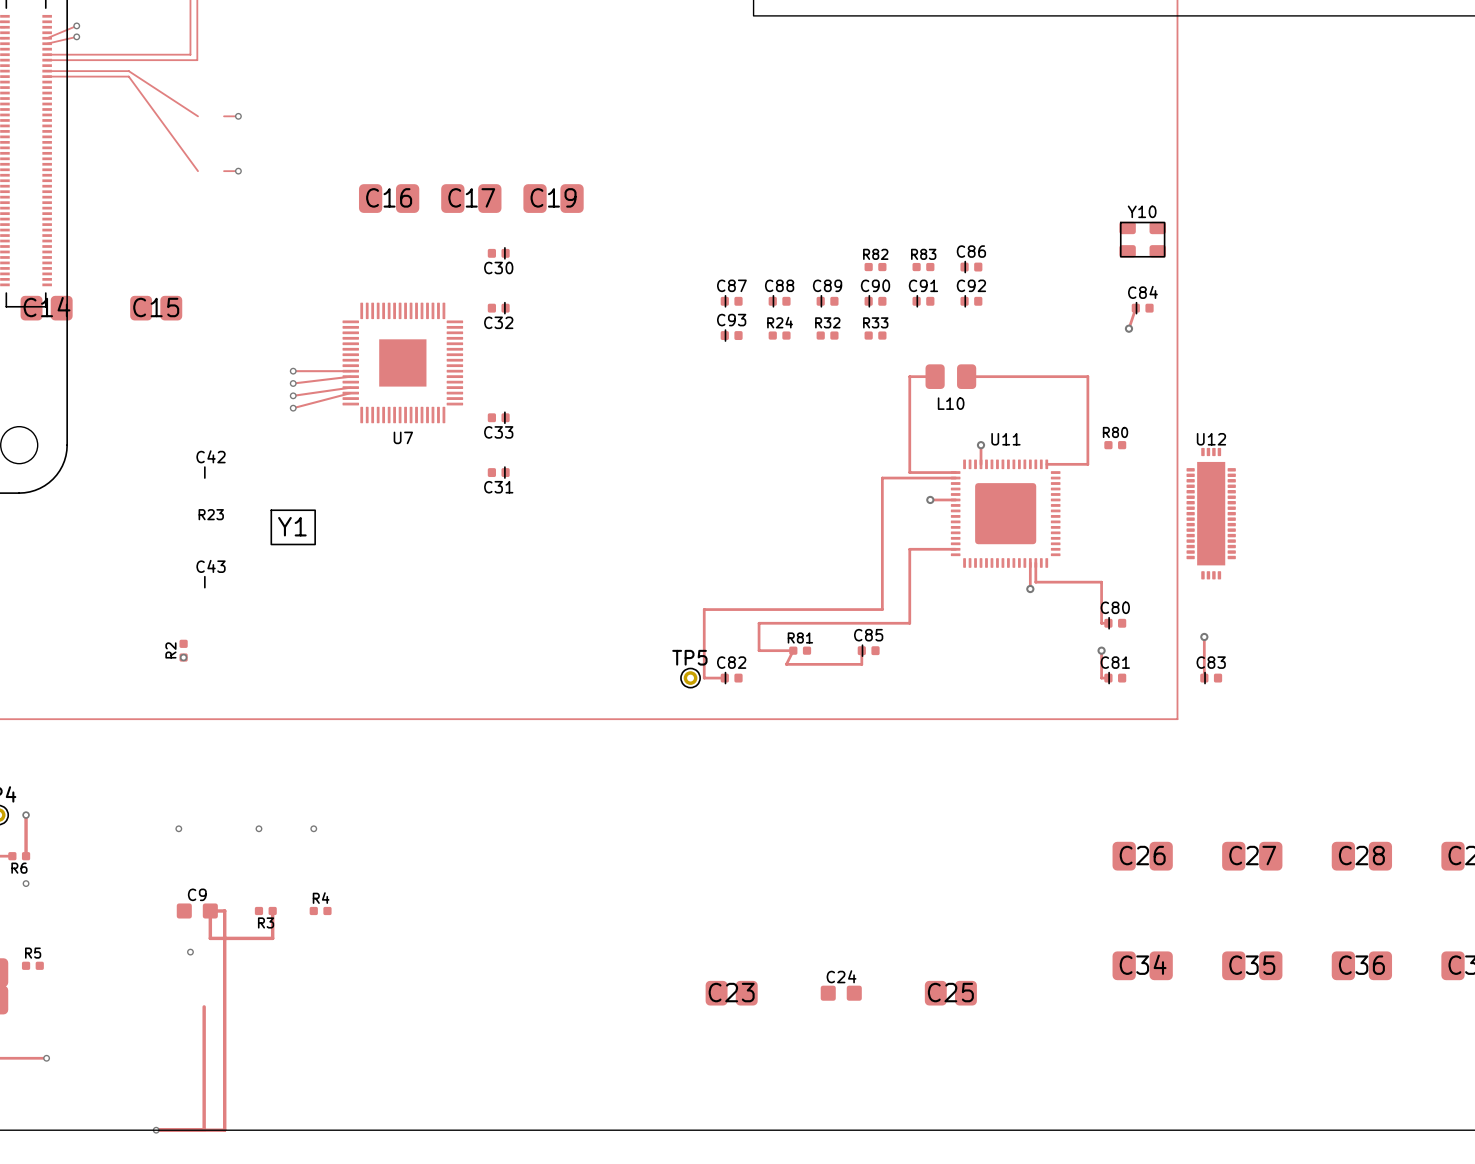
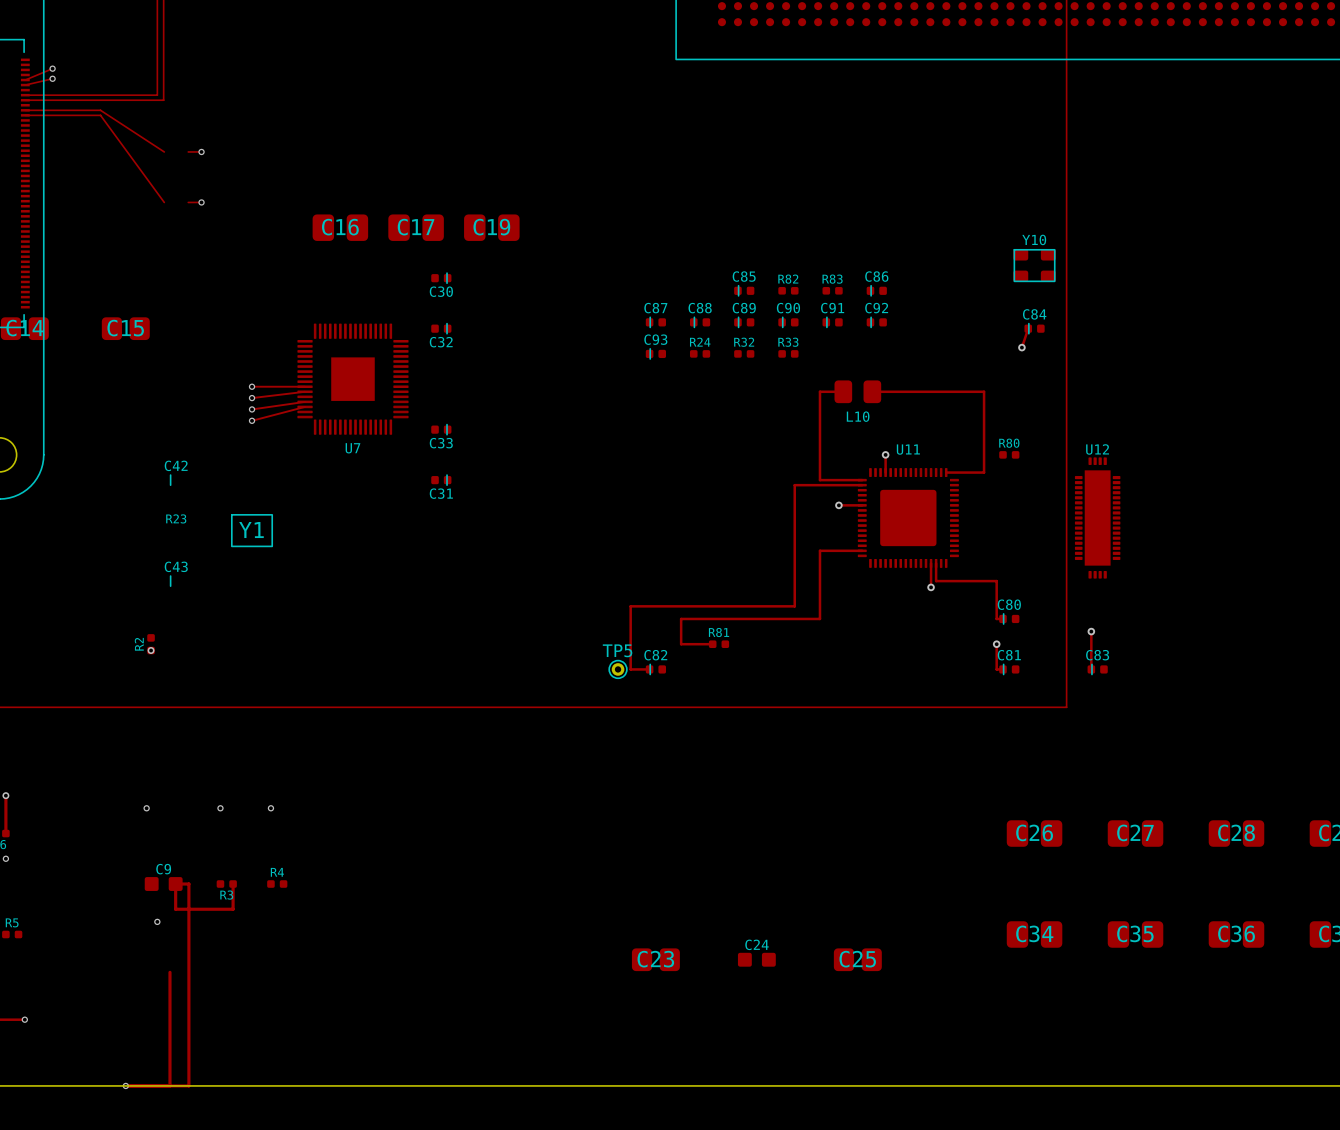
track: (793, 650) (786, 664) (861, 664) (861, 650) -> none
C85 position: (868, 650) -> (744, 290)

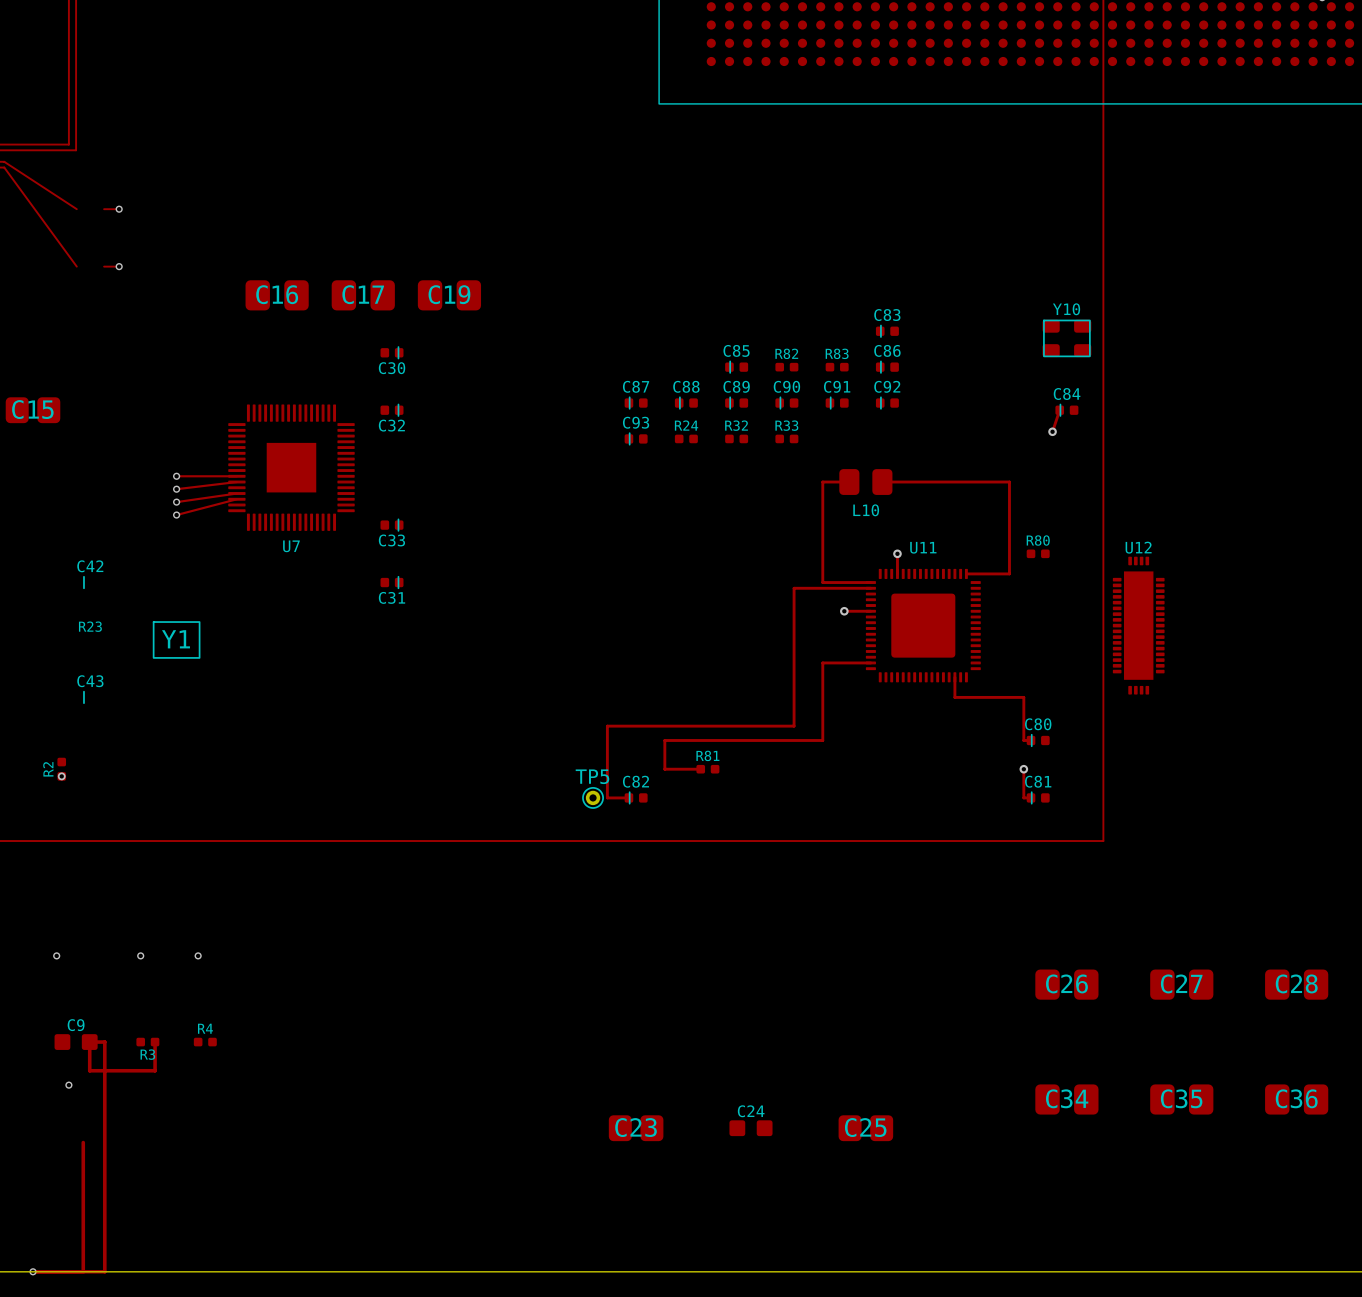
track: (931, 563) (931, 587) -> none
via: (931, 587) -> none
track: (1091, 631) (1091, 669) -> none
via: (1091, 631) -> none
C83 position: (1097, 669) -> (887, 331)

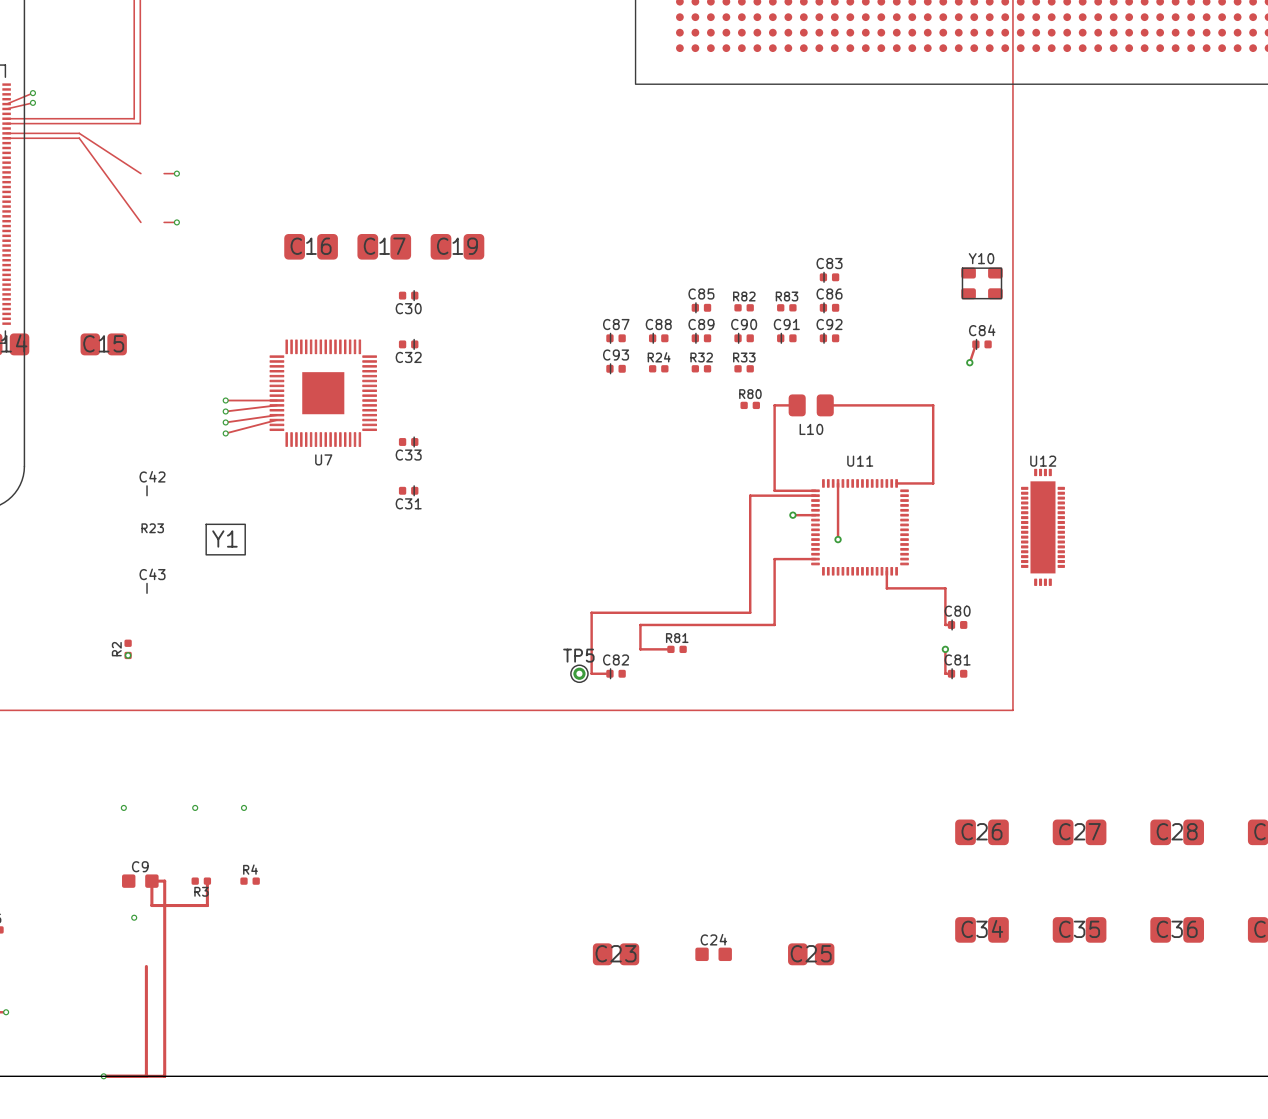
track: (897, 553) (897, 573) -> (838, 539) (838, 483)
via position: (897, 553) -> (838, 539)
R80 position: (1038, 553) -> (750, 405)
U11 footprint: [865, 568, 981, 683] -> [811, 479, 909, 576]

